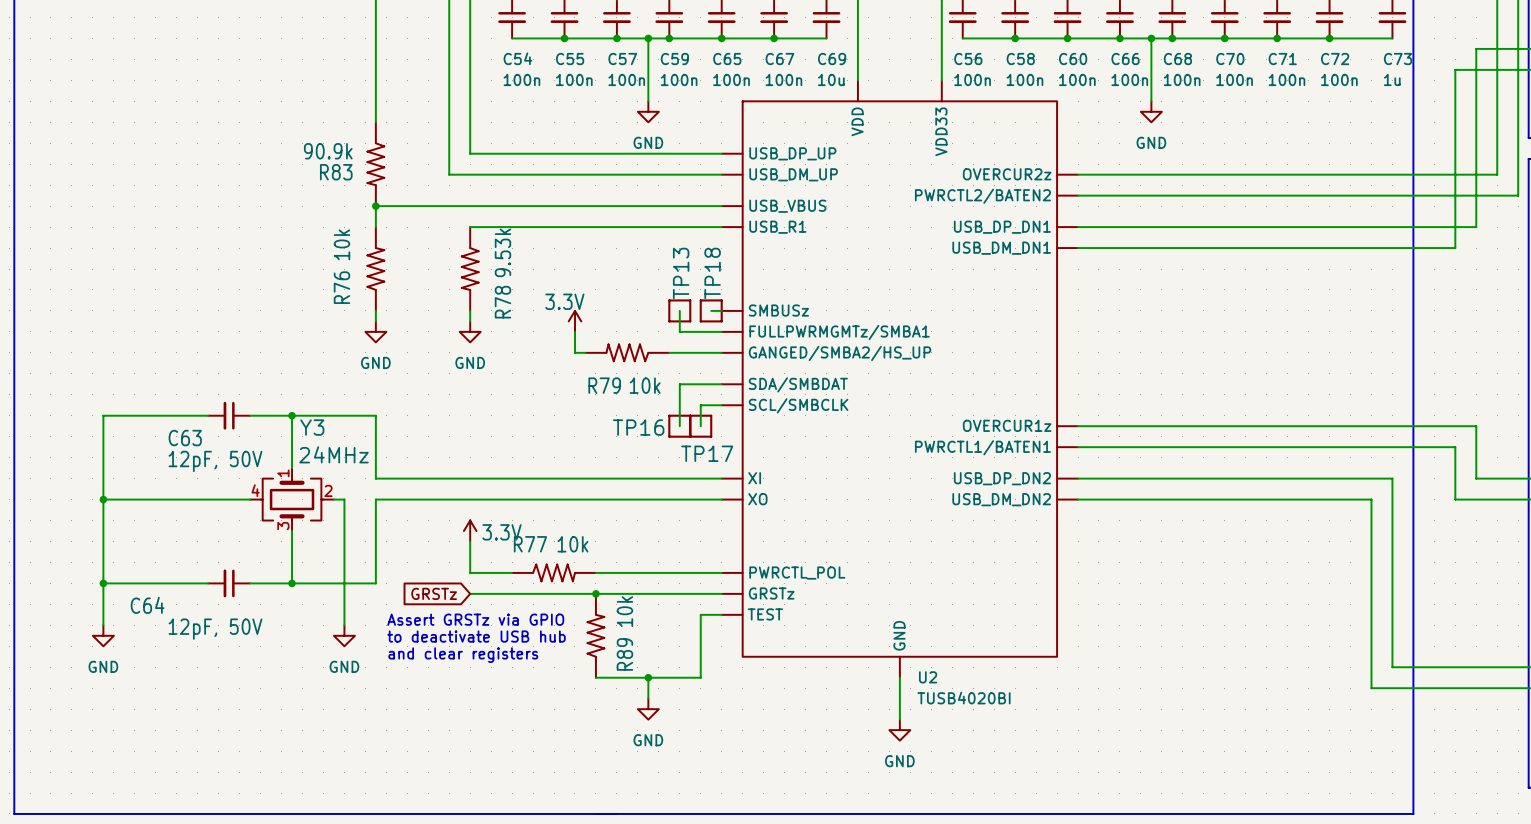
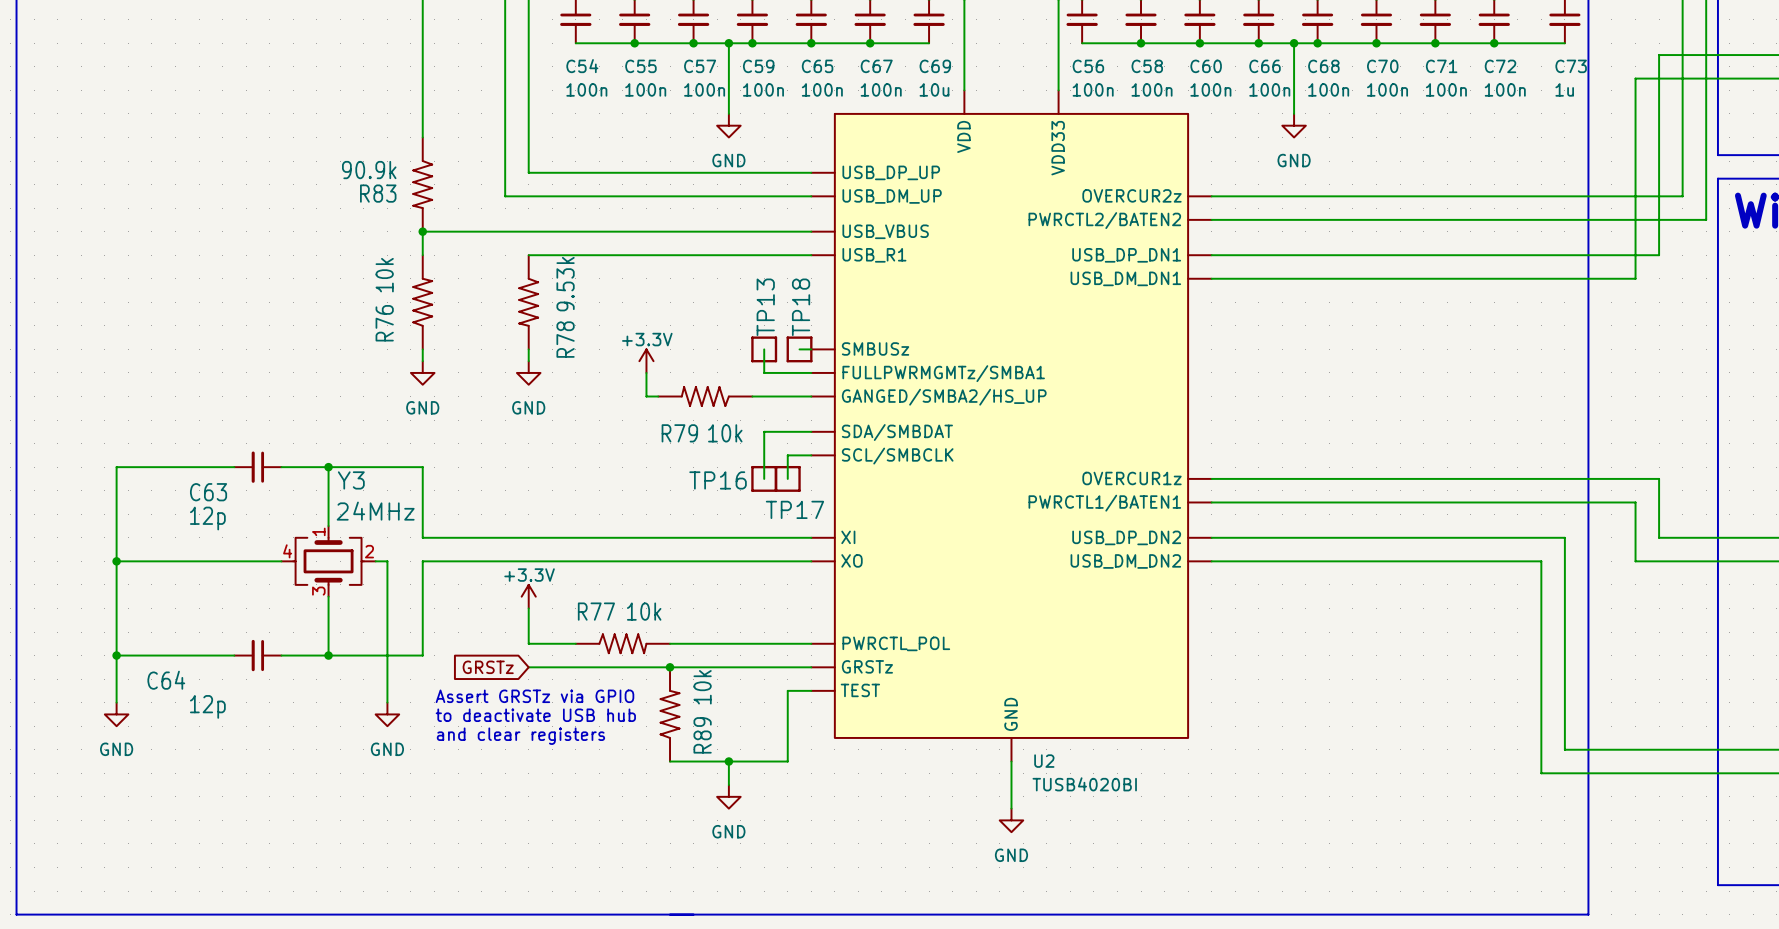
U2 symbol: [721, 80, 1079, 678] -> [811, 90, 1212, 762]
power symbol: 3.3V (574, 321) -> +3.3V (646, 361)
C63 value: 12pF, 50V (215, 461) -> 12p (207, 518)
power symbol: 3.3V (470, 531) -> +3.3V (528, 596)
C64 value: 12pF, 50V (215, 629) -> 12p (207, 706)

